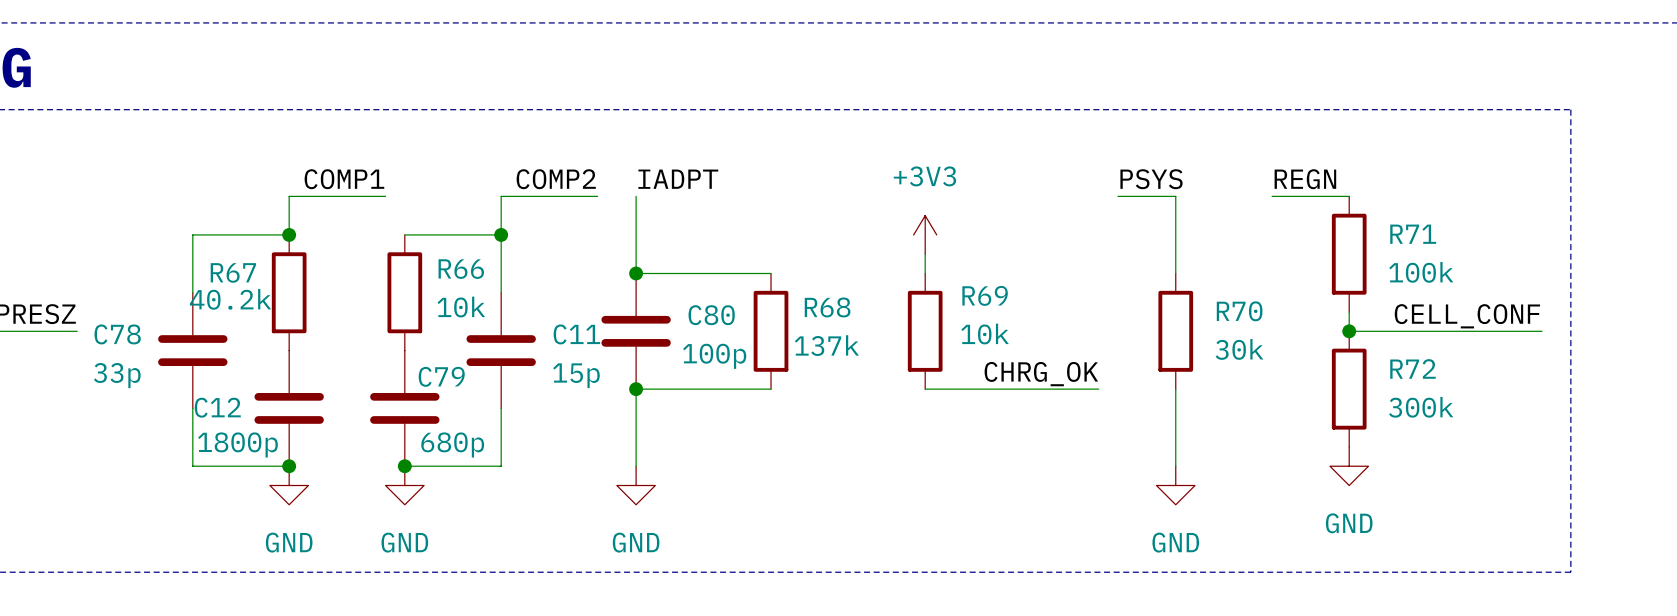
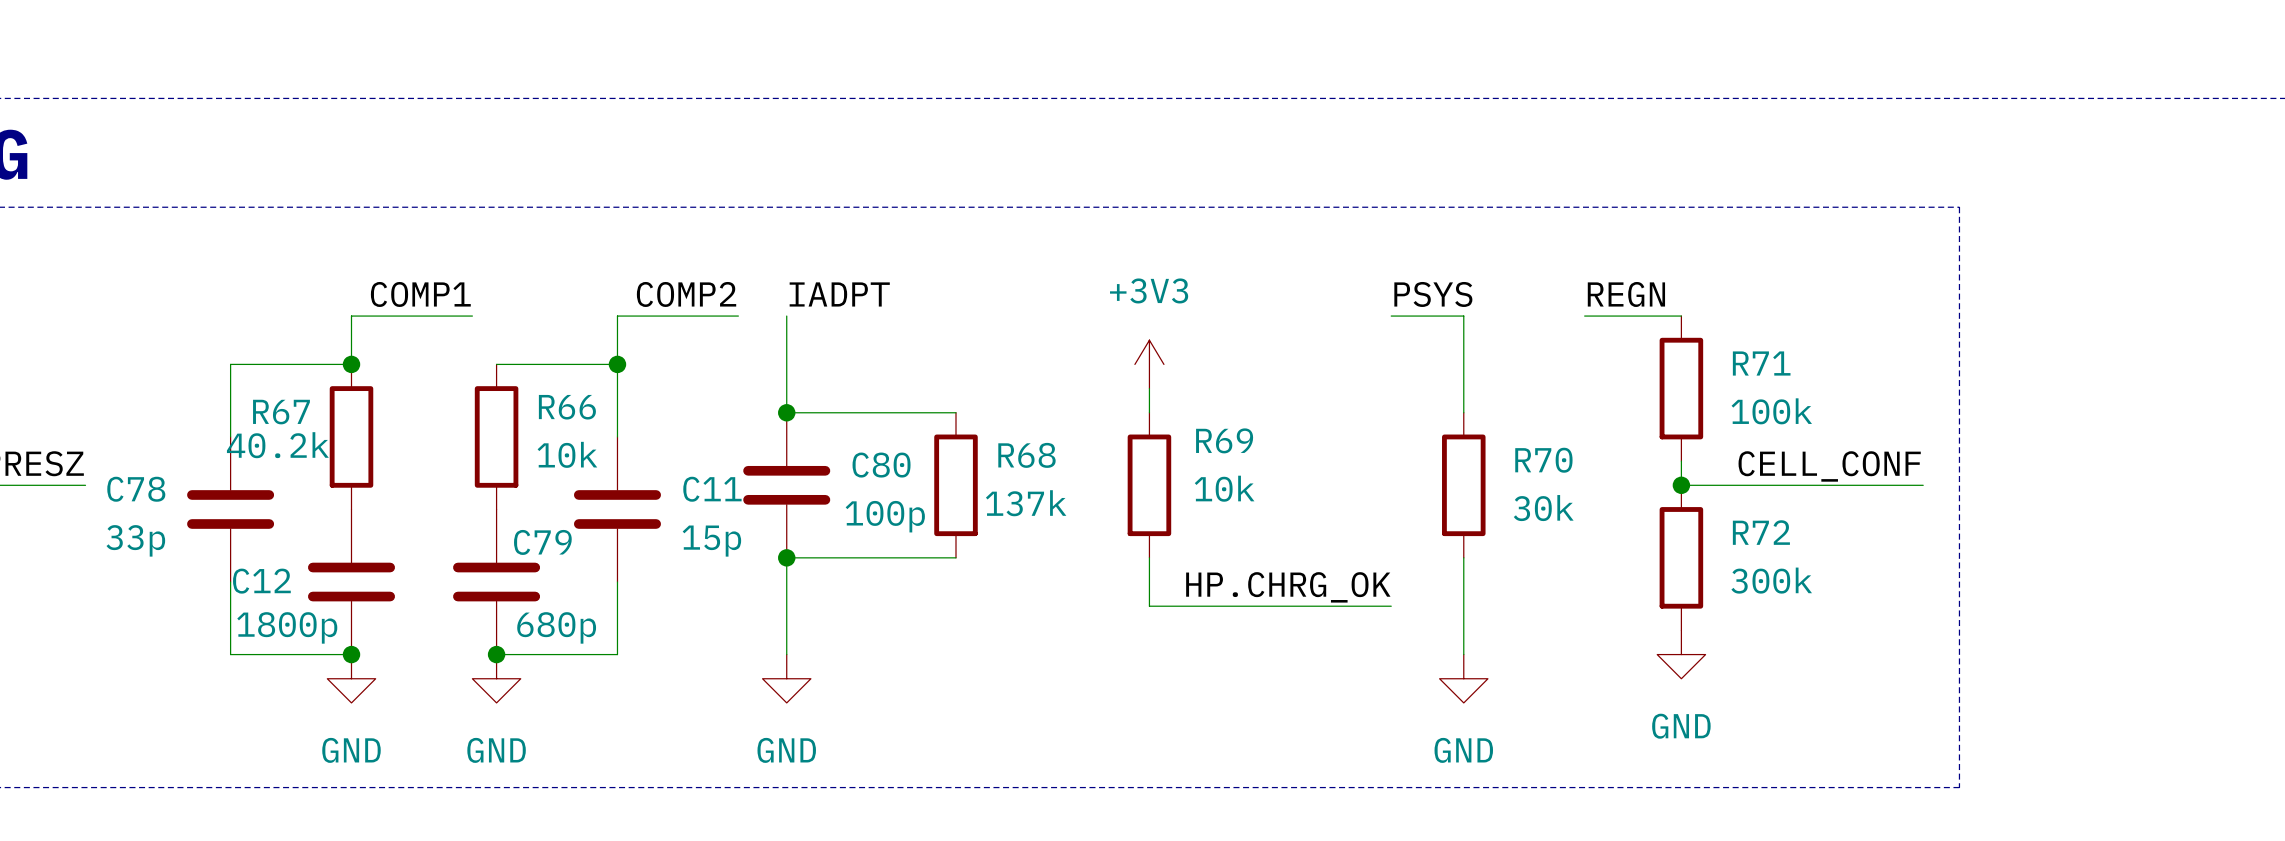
label: CHRG_OK (1041, 374) -> HP.CHRG_OK (1288, 587)
wire: (925, 389) (1098, 389) -> (1149, 557) (1149, 606) (1391, 606)

